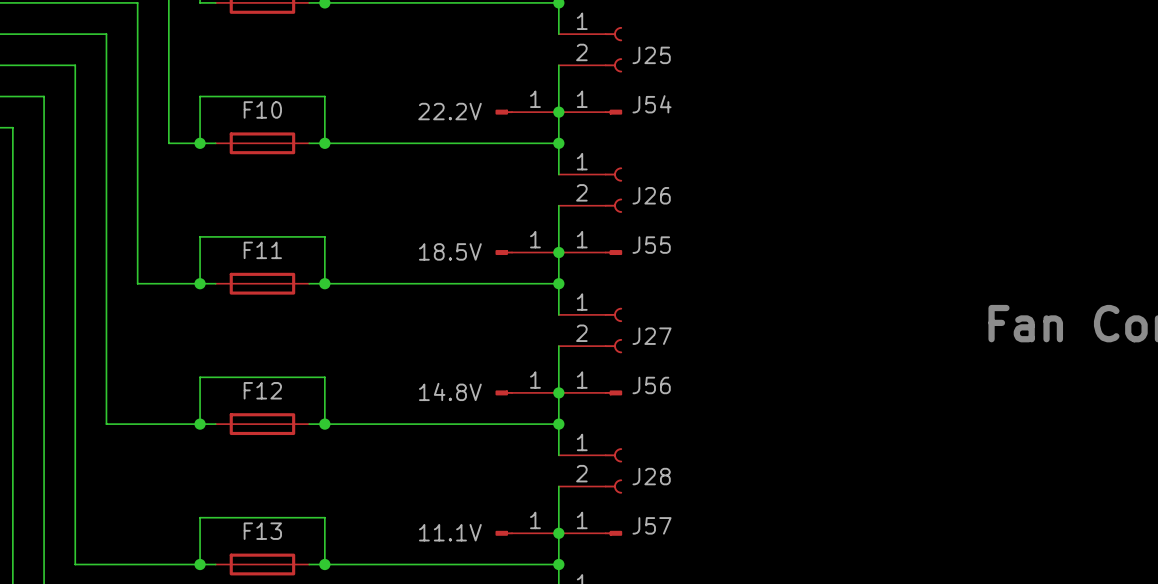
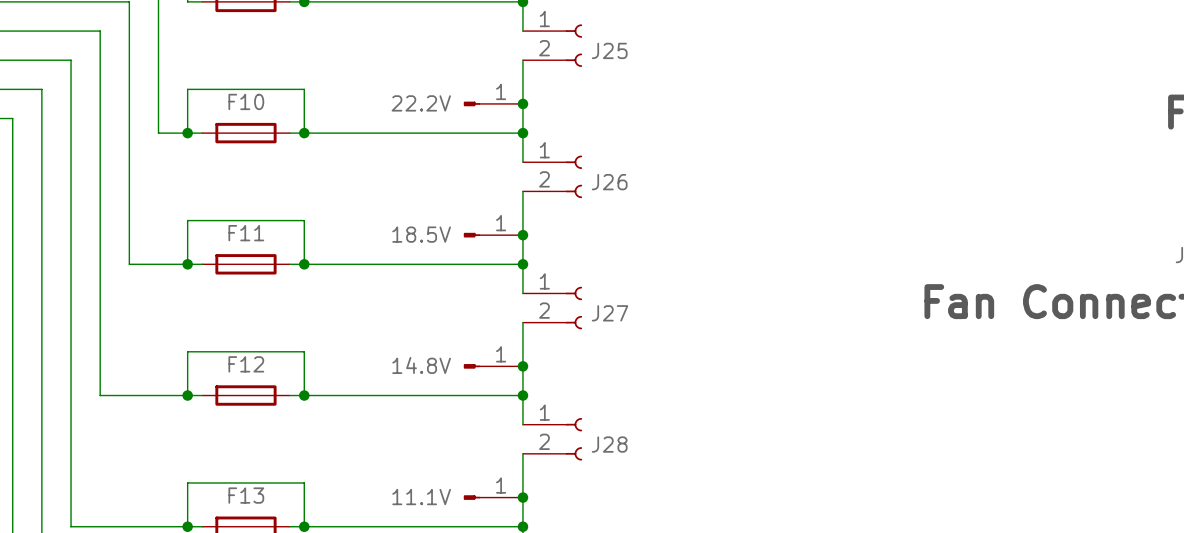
J54: (590, 112) -> none
J55: (590, 252) -> none
J56: (590, 392) -> none
J57: (590, 533) -> none

